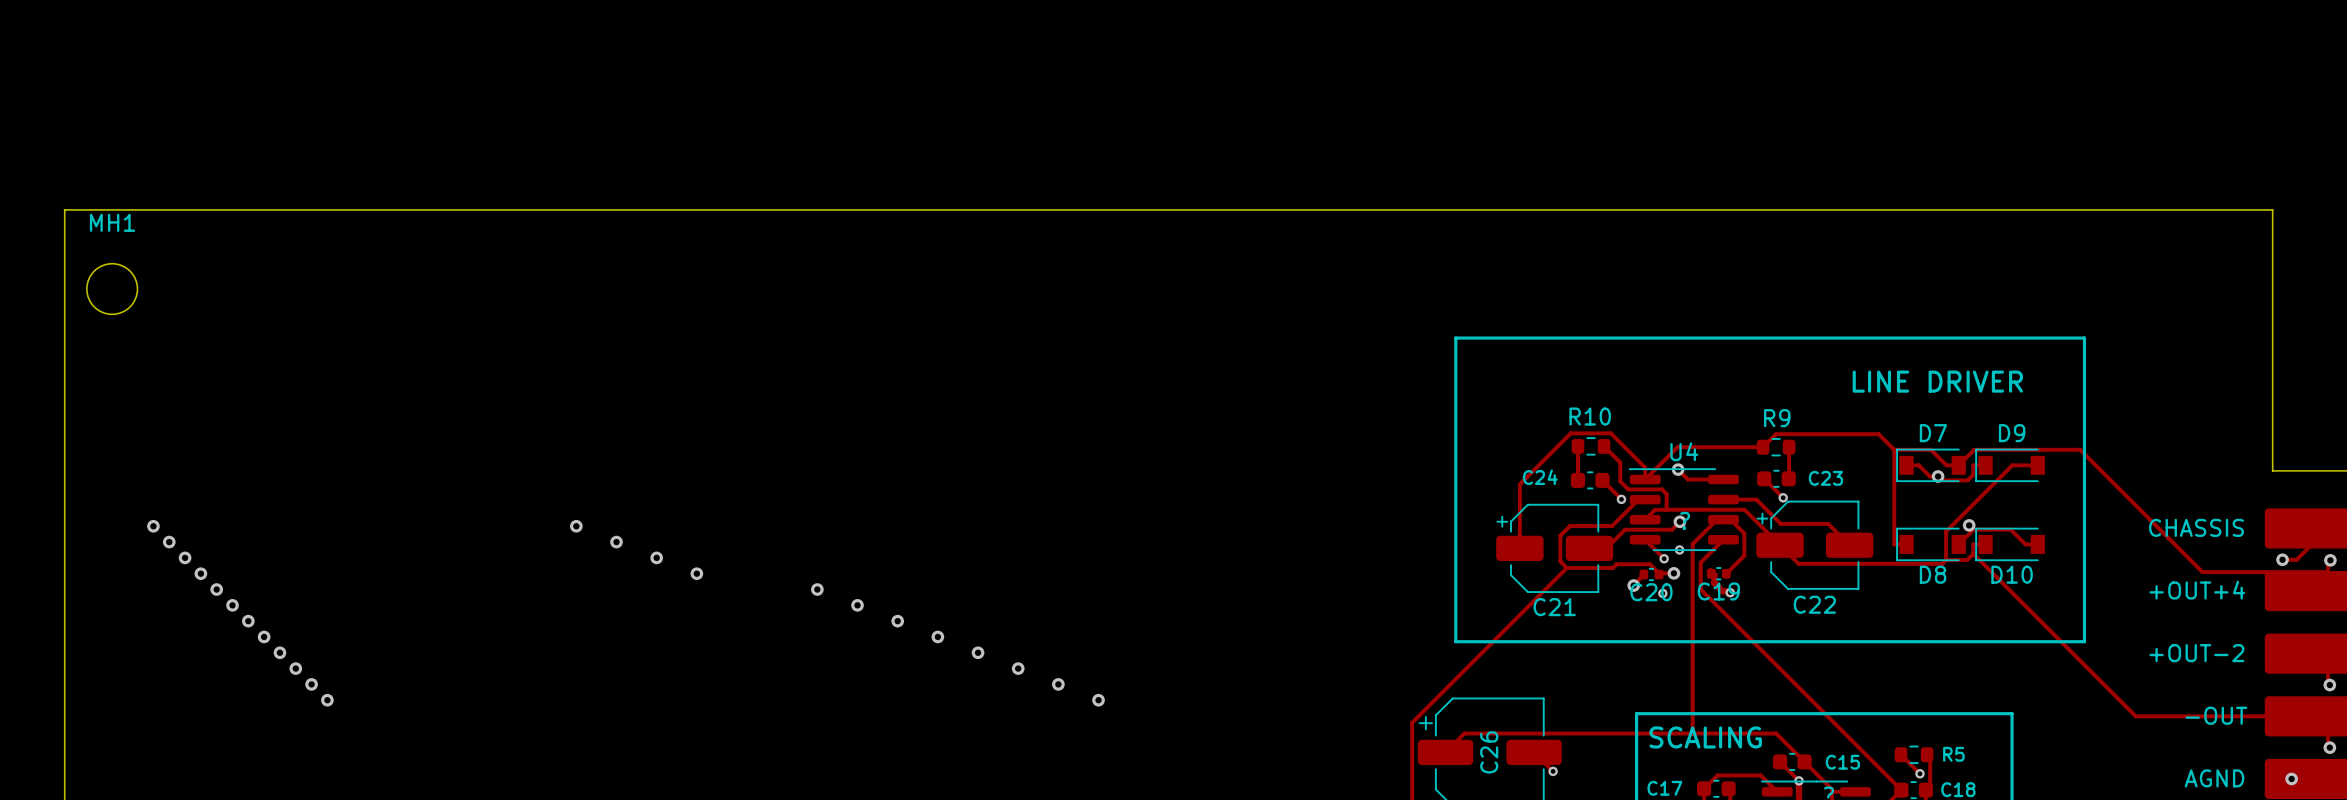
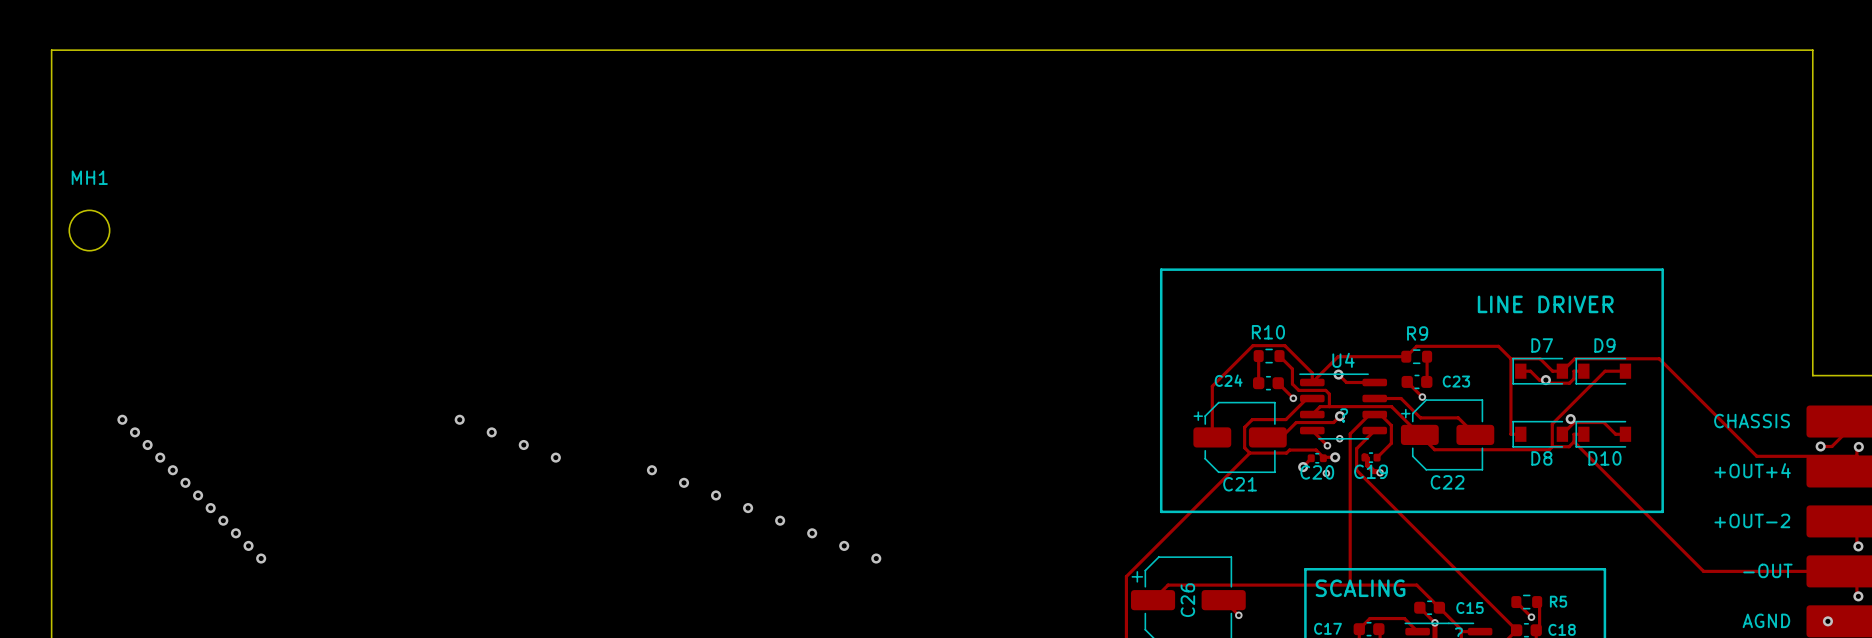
board edge: (64, 209) (2272, 209) -> (51, 167) (51, 50) (1812, 50) (1812, 167)

